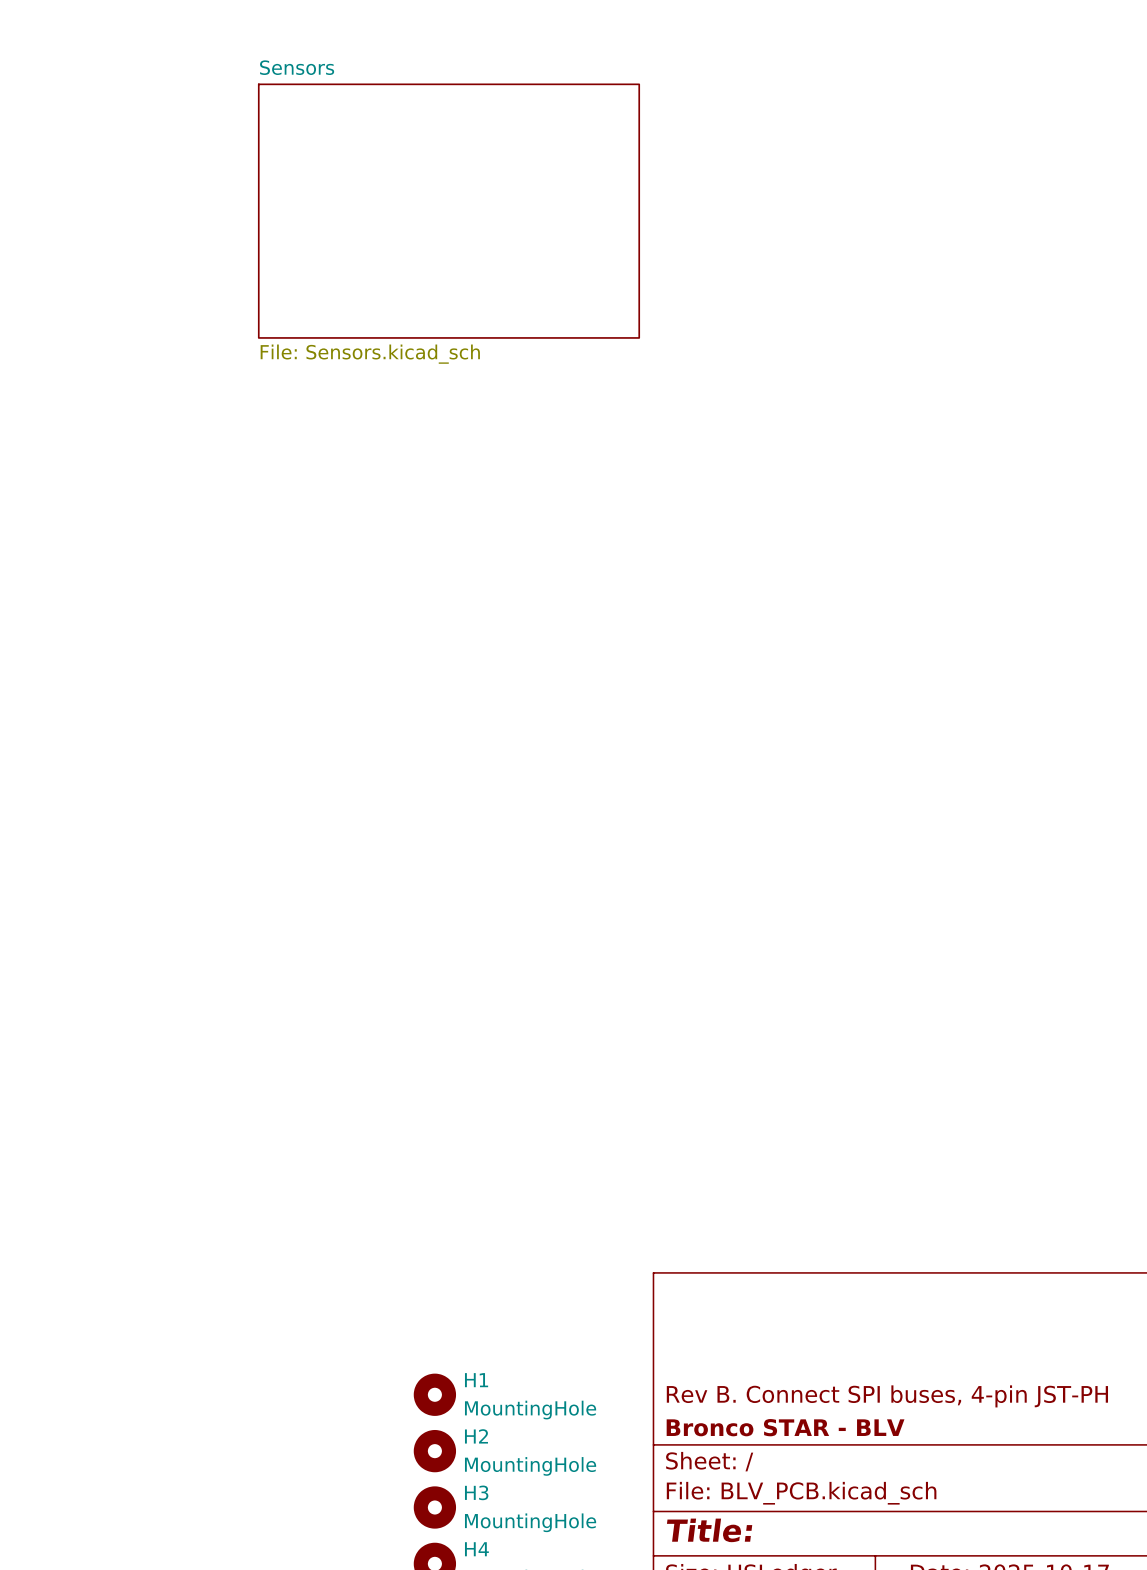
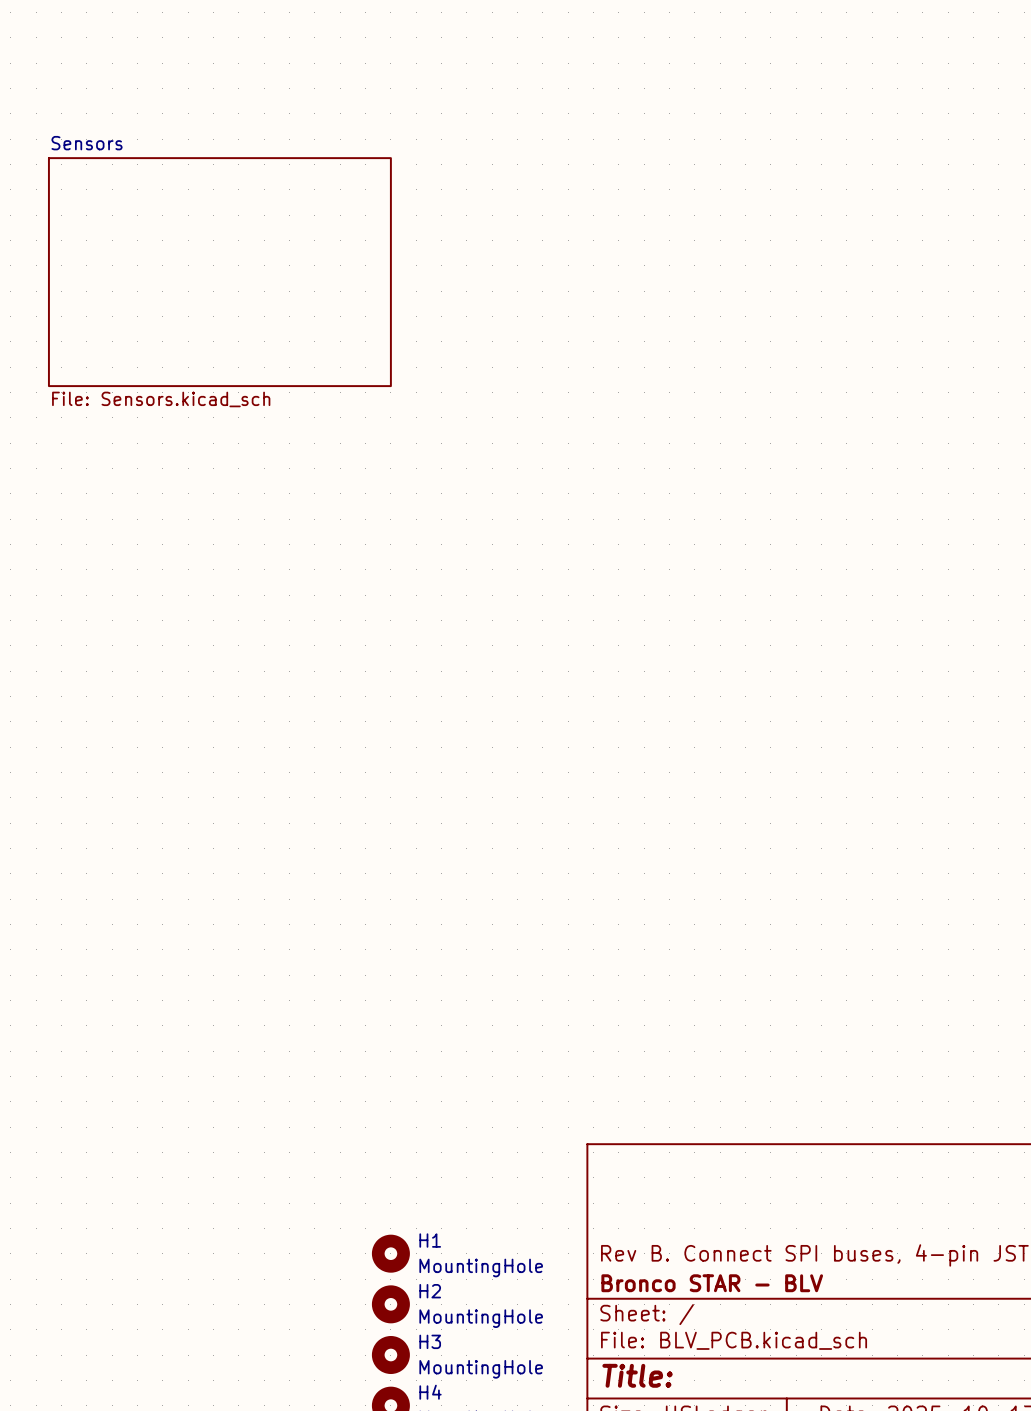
sheet Sensors position: (448, 211) -> (219, 272)

